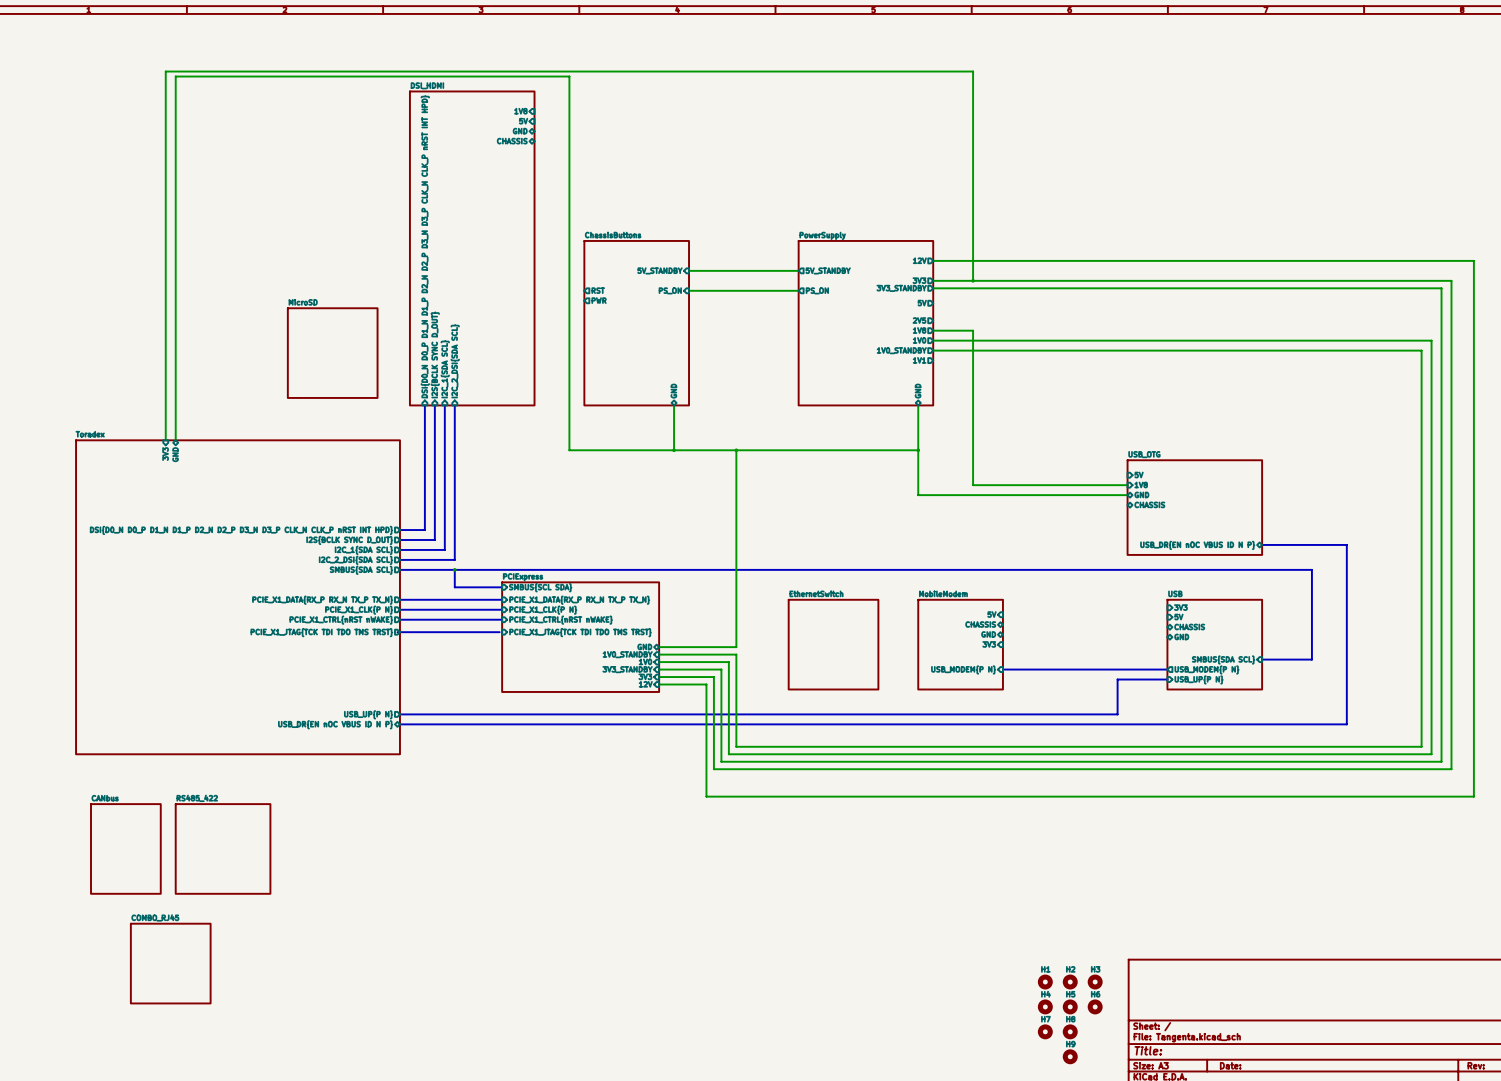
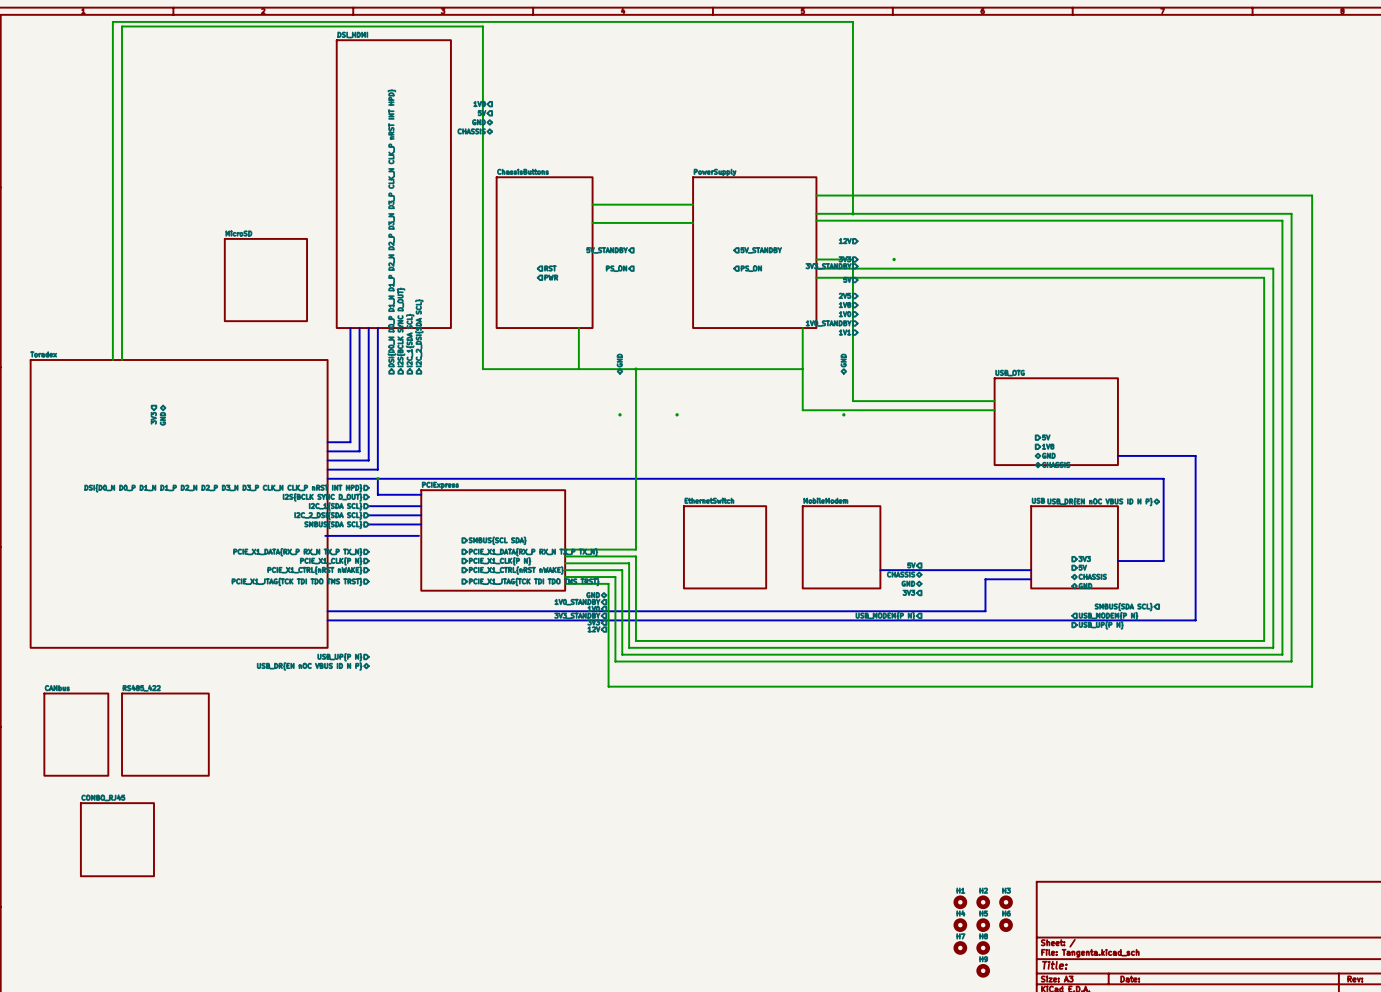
sheet position: (472, 248) -> (393, 184)
wire: (933, 260) (1473, 260) (1473, 796) (706, 796) (706, 684) (659, 684) -> none
wire: (689, 270) (798, 270) -> (592, 204) (693, 204)
wire: (933, 280) (1451, 280) (1451, 769) (713, 769) (713, 677) (659, 677) -> (816, 213) (1291, 213) (1291, 661) (615, 661) (615, 577) (565, 577)
wire: (973, 280) (973, 71) (165, 71) (165, 440) -> (852, 213) (852, 21) (112, 21) (112, 360)
wire: (933, 288) (1441, 288) (1441, 761) (721, 761) (721, 669) (659, 669) -> (816, 220) (1282, 220) (1282, 654) (622, 654) (622, 570) (565, 570)
wire: (689, 290) (798, 290) -> (592, 222) (693, 222)
wire: none -> (816, 277) (1264, 277) (1264, 640) (635, 640) (635, 556) (565, 556)
sheet position: (636, 323) -> (544, 252)
sheet position: (865, 323) -> (754, 252)
wire: (933, 330) (973, 330) (973, 485) (1127, 485) -> (816, 259) (852, 259) (852, 401) (994, 401)
wire: (933, 340) (1431, 340) (1431, 754) (728, 754) (728, 662) (659, 662) -> (816, 268) (1273, 268) (1273, 647) (629, 647) (629, 563) (565, 563)
wire: (933, 350) (1421, 350) (1421, 746) -> (816, 195) (1312, 195) (1312, 686) (1305, 686)
sheet position: (332, 353) -> (265, 280)
bus: none -> (368, 328) (368, 460) (327, 460)
bus: none -> (377, 328) (377, 469) (327, 469)
bus: (424, 405) (424, 530) (399, 530) -> (350, 328) (350, 442) (327, 442)
bus: (434, 405) (434, 539) (399, 539) -> (359, 328) (359, 451) (327, 451)
bus: (444, 405) (444, 549) -> (421, 506) (409, 506)
bus: (454, 405) (454, 559) -> (421, 515) (418, 515)
wire: (674, 405) (674, 450) -> (578, 328) (578, 369)
wire: (918, 405) (918, 495) (1127, 495) -> (802, 328) (802, 410) (994, 410)
wire: (175, 440) (175, 76) (569, 76) (569, 450) (918, 450) -> (122, 360) (122, 26) (482, 26) (482, 369) (802, 369)
wire: (736, 450) (736, 647) (659, 647) -> (635, 369) (635, 549) (565, 549)
sheet position: (1194, 507) -> (1056, 421)
bus: none -> (327, 478) (1163, 478) (1163, 561) (1117, 561)
junction: none -> (377, 478)
bus: (1262, 544) (1346, 544) (1346, 724) (399, 724) -> (1117, 455) (1195, 455) (1195, 620) (327, 620)
bus: (454, 569) (454, 587) (502, 587) -> (377, 478) (377, 494) (421, 494)
junction: (454, 569) -> none
bus: (457, 569) (1311, 569) (1311, 659) (1262, 659) -> none
sheet position: (238, 597) -> (179, 503)
bus: (399, 599) (502, 599) -> none
bus: (399, 609) (502, 609) -> none
bus: (399, 619) (502, 619) -> none
bus: (397, 632) (499, 632) -> (325, 535) (418, 535)
sheet position: (580, 637) -> (493, 540)
sheet position: (833, 644) -> (725, 547)
sheet position: (960, 644) -> (841, 547)
sheet position: (1214, 644) -> (1074, 547)
wire: (659, 654) (736, 654) (736, 746) -> (565, 583) (608, 583) (608, 686) (677, 686)
bus: (1002, 669) (1167, 669) -> (880, 570) (1031, 570)
bus: (1167, 679) (1117, 679) (1117, 714) (399, 714) -> (1031, 579) (985, 579) (985, 611) (327, 611)
sheet position: (125, 848) -> (76, 734)
sheet position: (223, 848) -> (165, 734)
sheet position: (170, 963) -> (117, 839)

